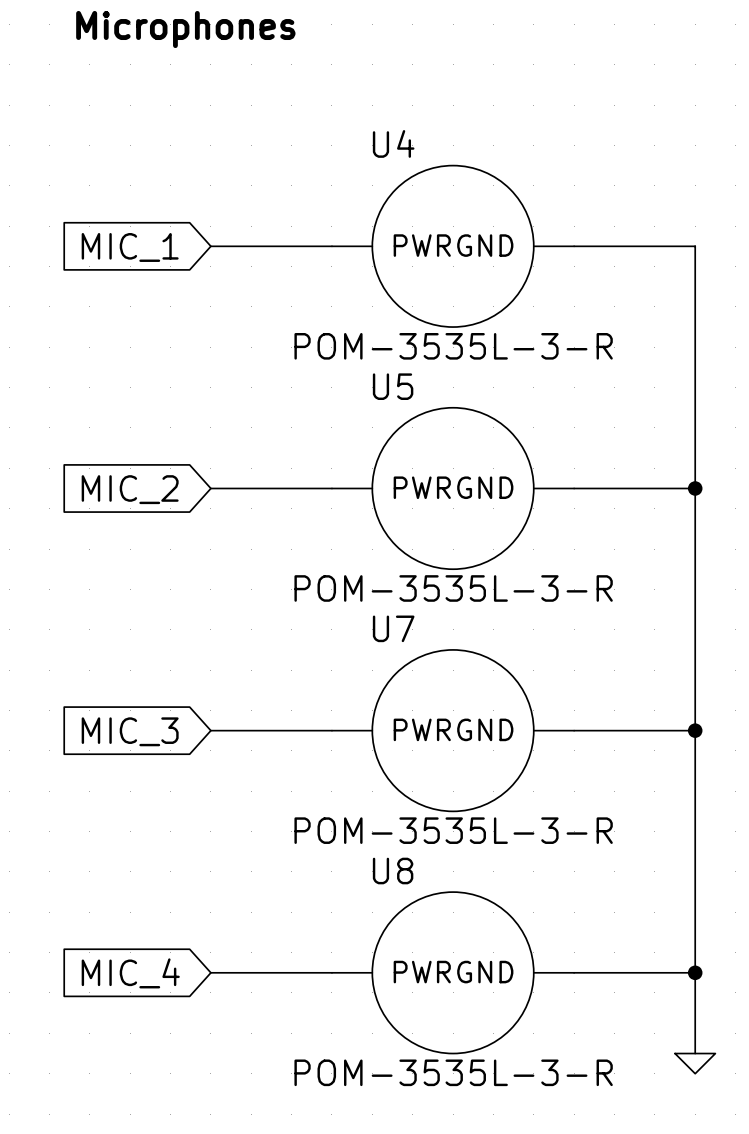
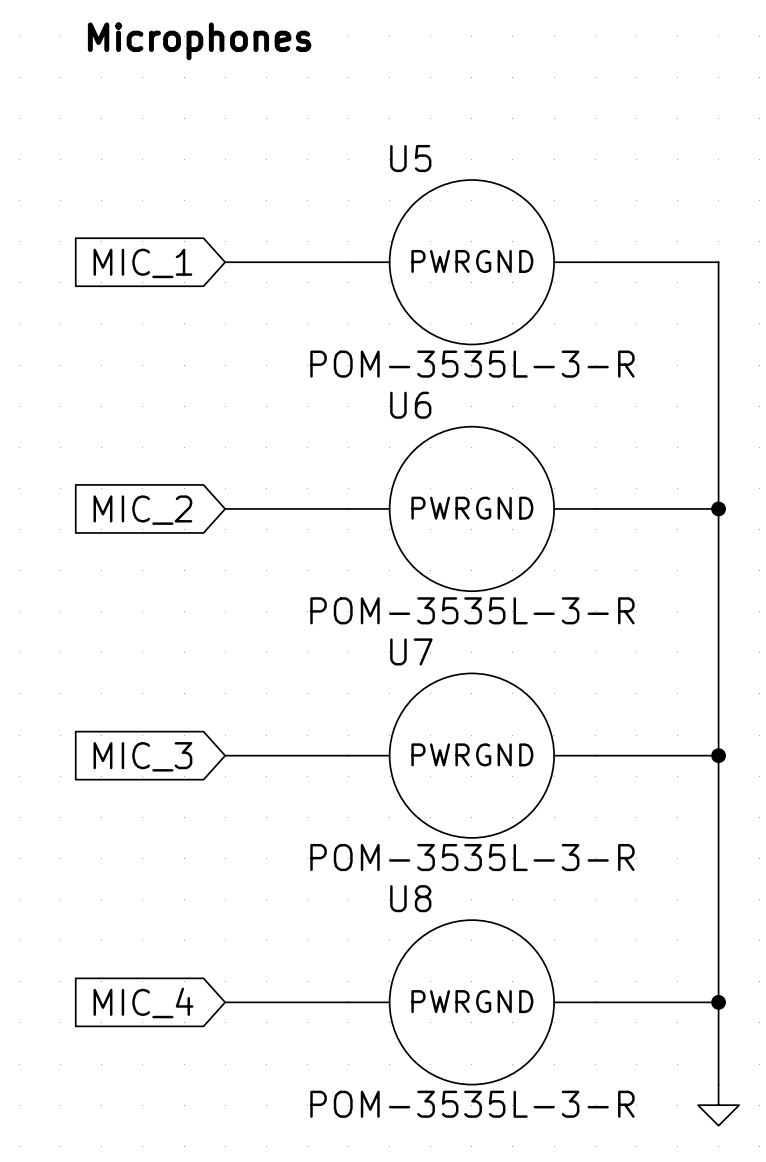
U4 name: U4 (393, 143) -> U5 (410, 158)
U5 name: U5 (393, 386) -> U6 (410, 405)
power symbol shape: [675, 1053, 716, 1074] -> [698, 1084, 740, 1126]

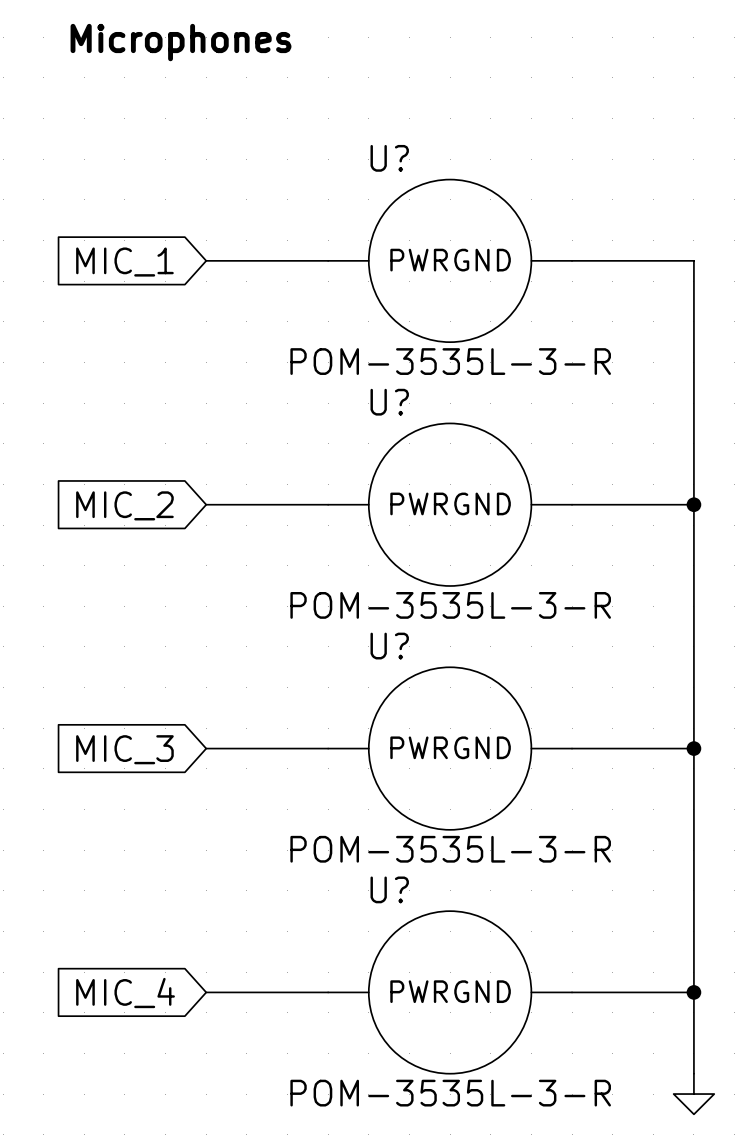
U5 name: U5 (410, 158) -> U? (389, 158)
U6 name: U6 (410, 405) -> U? (389, 402)
U7 name: U7 (411, 651) -> U? (389, 646)
U8 name: U8 (410, 898) -> U? (389, 889)

